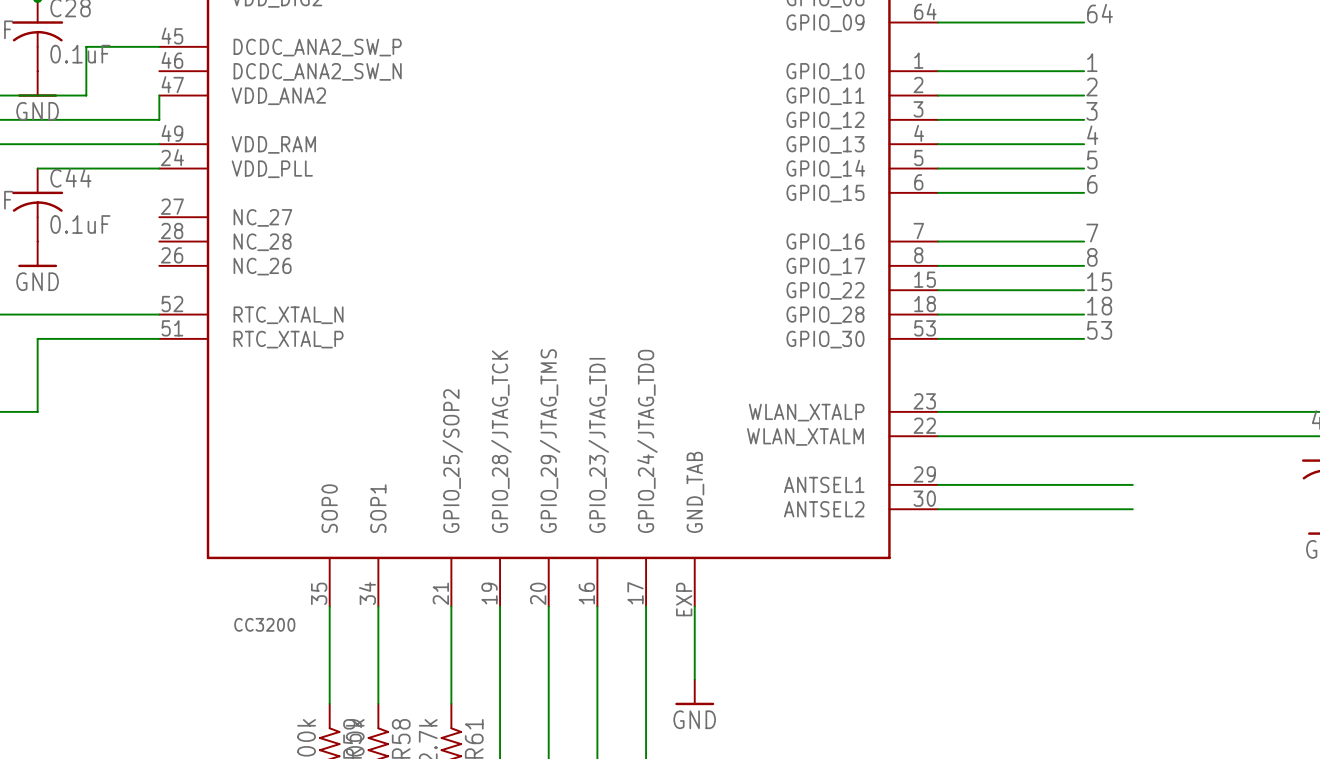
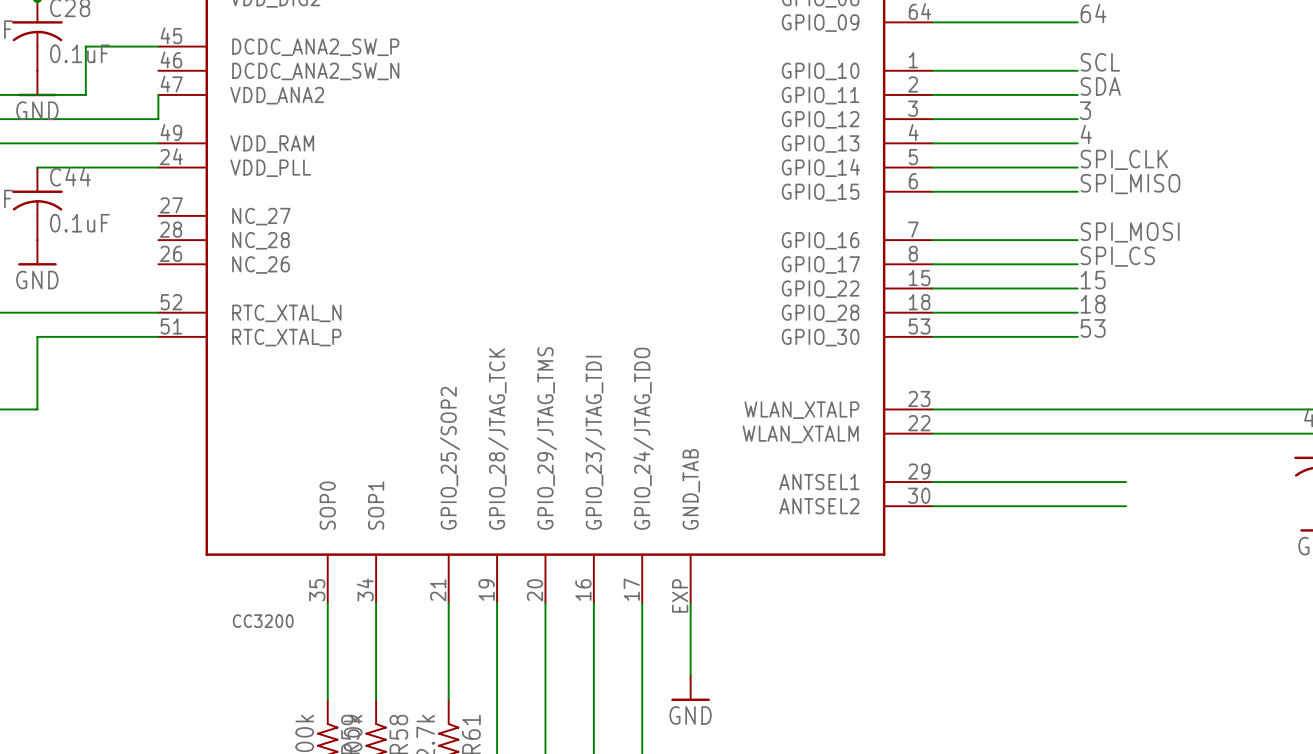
label: 1 (1092, 62) -> SCL (1100, 62)
label: 2 (1091, 87) -> SDA (1100, 86)
label: 5 (1092, 160) -> SPI_CLK (1124, 159)
label: 6 (1092, 184) -> SPI_MISO (1130, 184)
label: 7 (1092, 233) -> SPI_MOSI (1130, 232)
label: 8 (1092, 257) -> SPI_CS (1117, 256)

